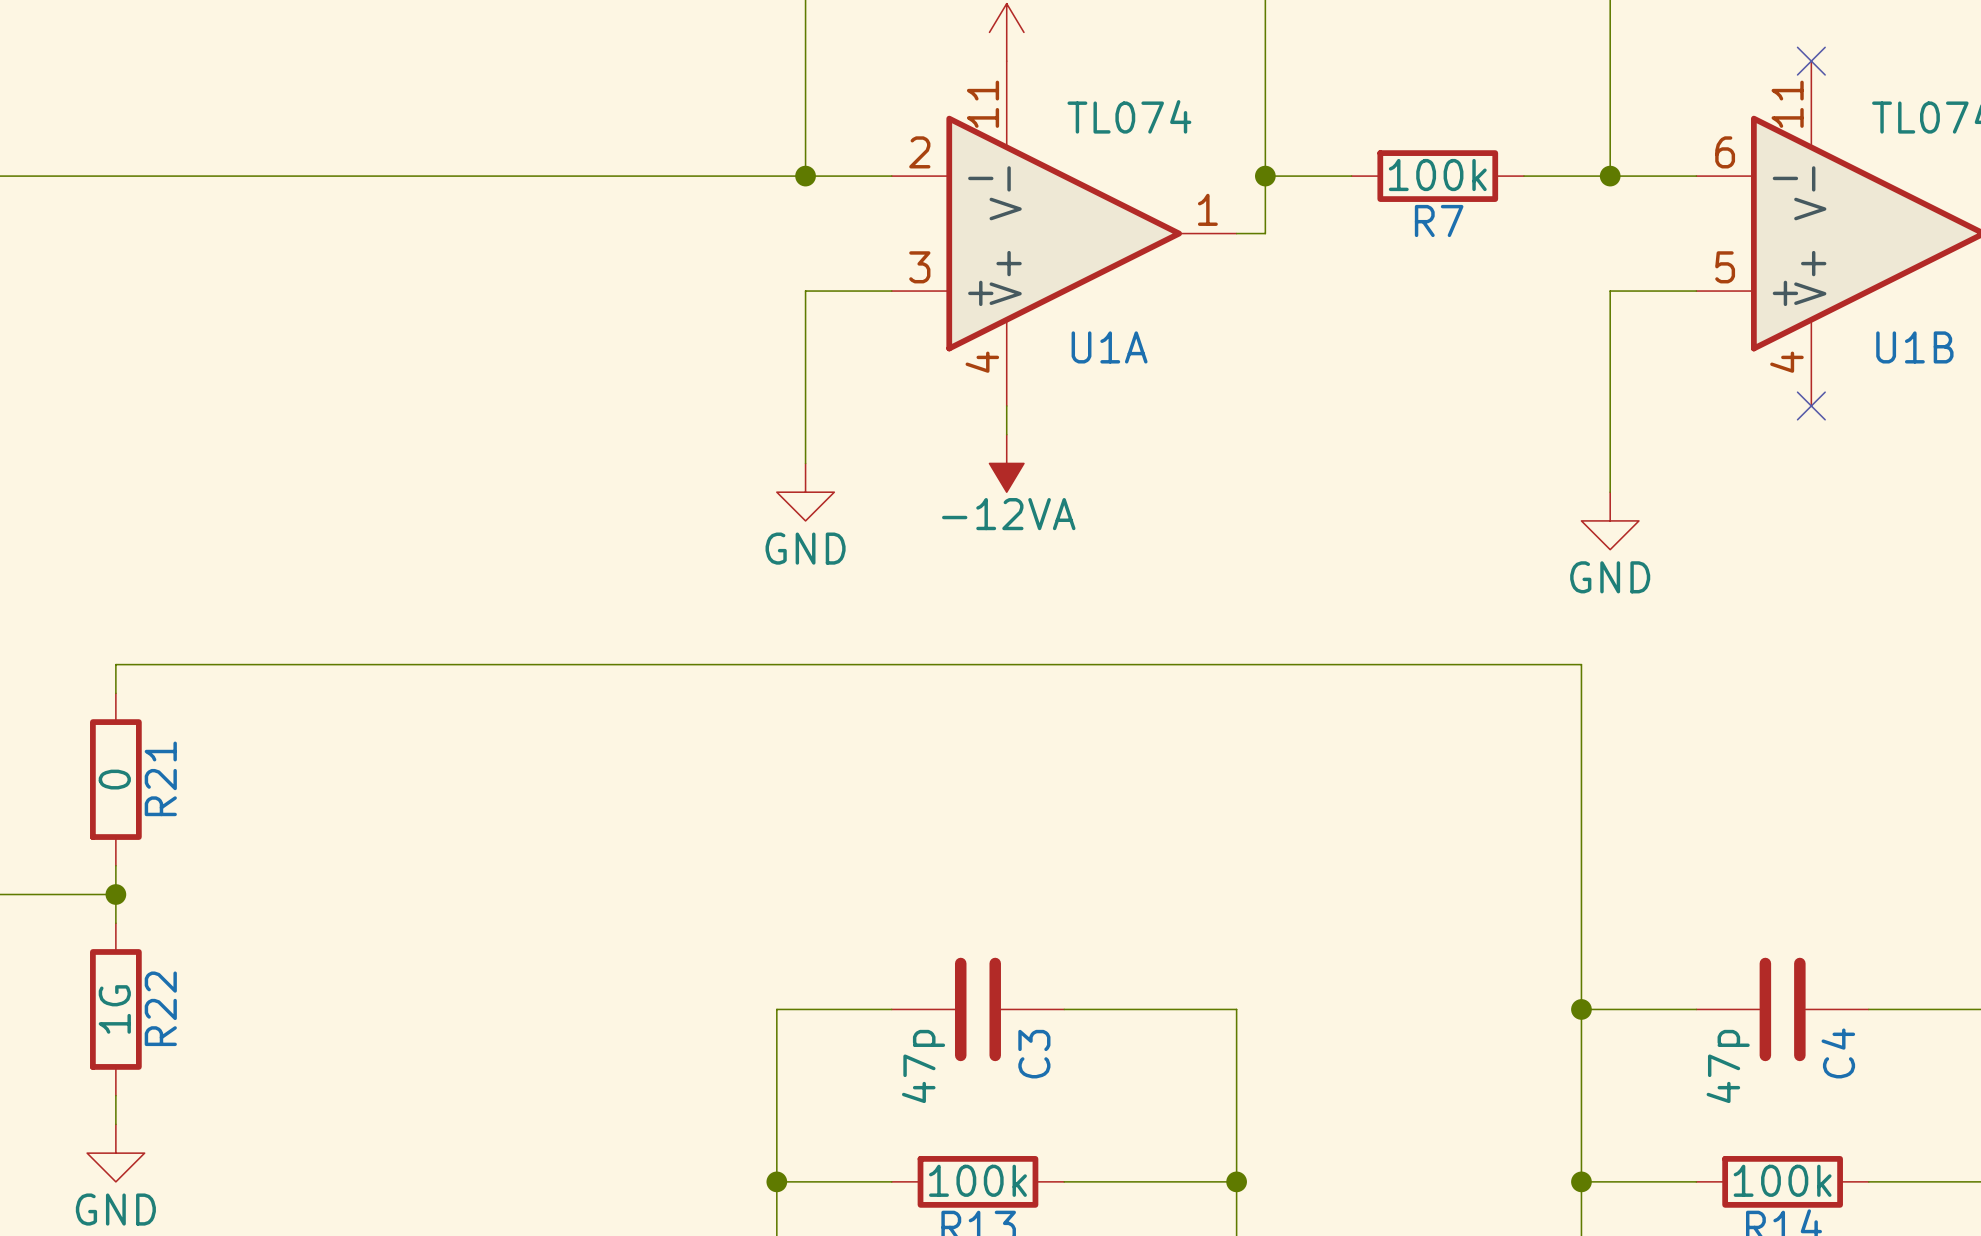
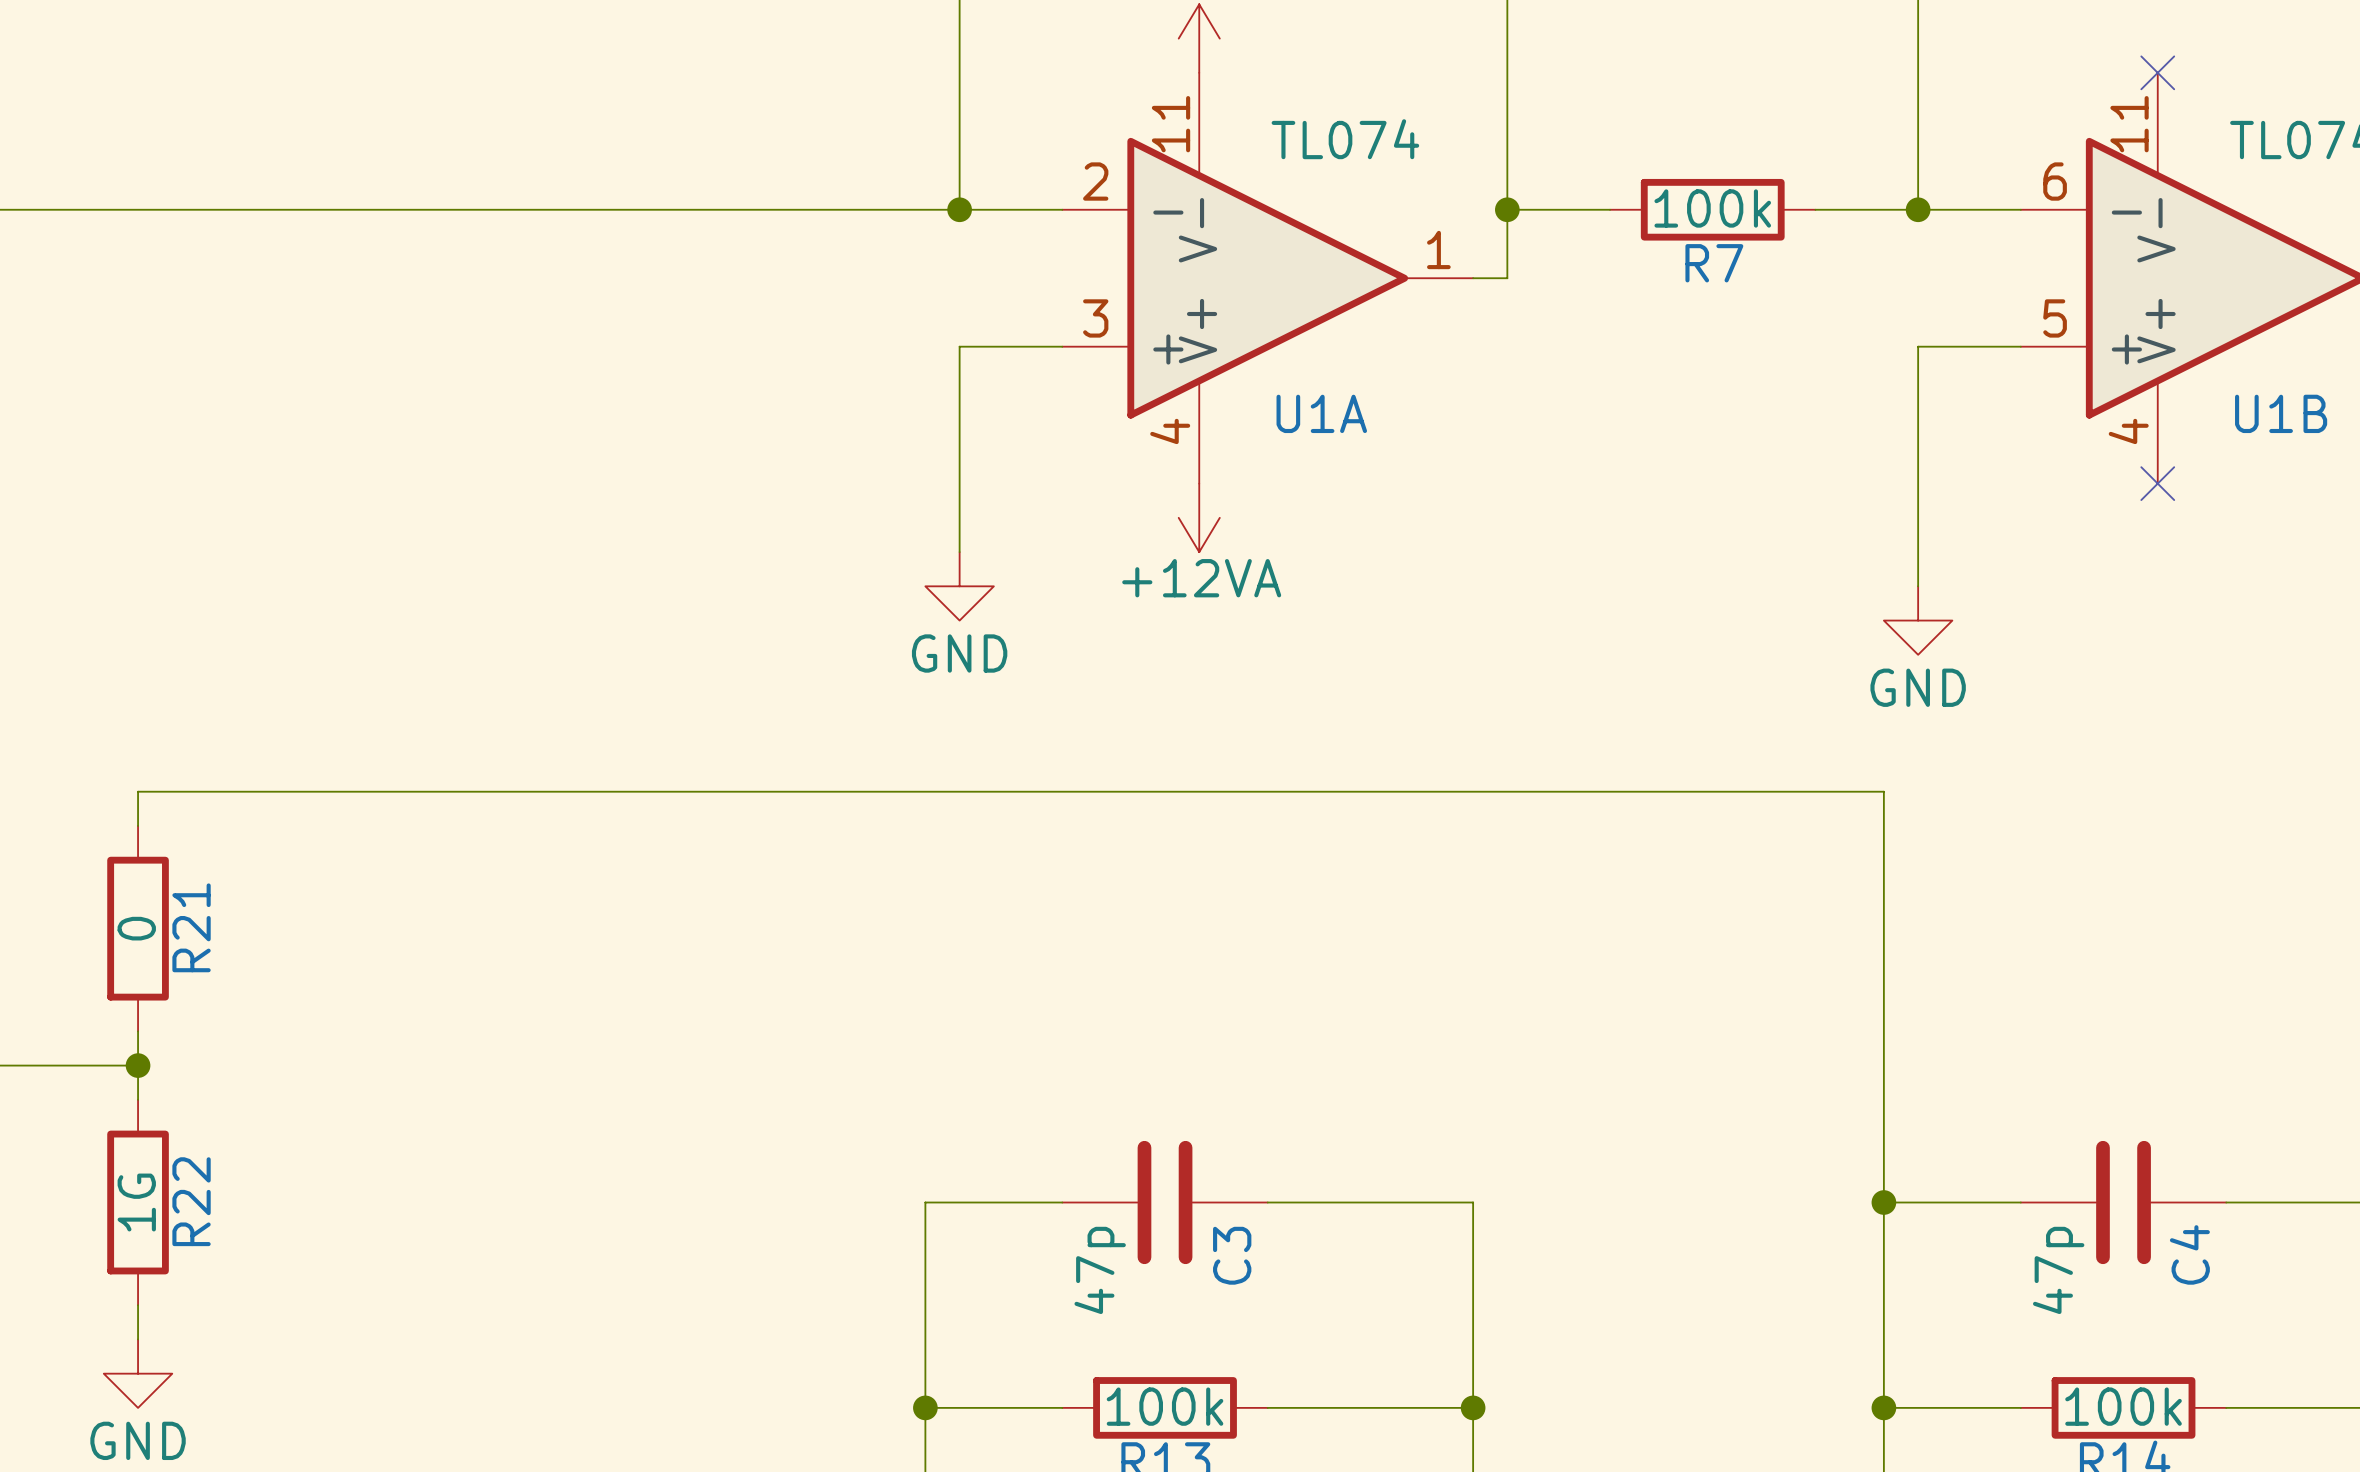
power symbol: none -> +12VA (1199, 517)
power symbol: -12VA (1006, 463) -> none

